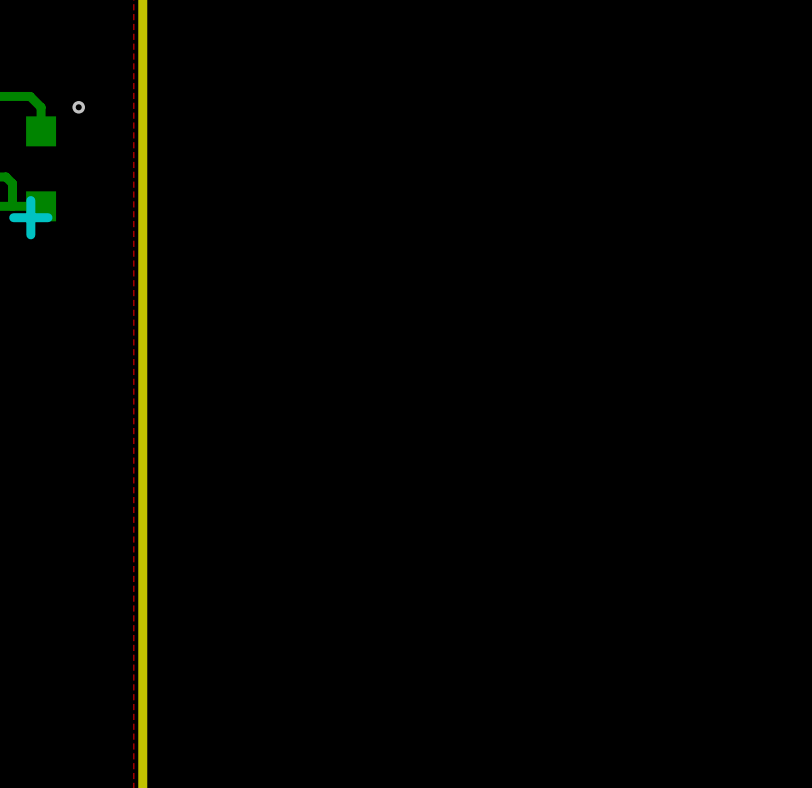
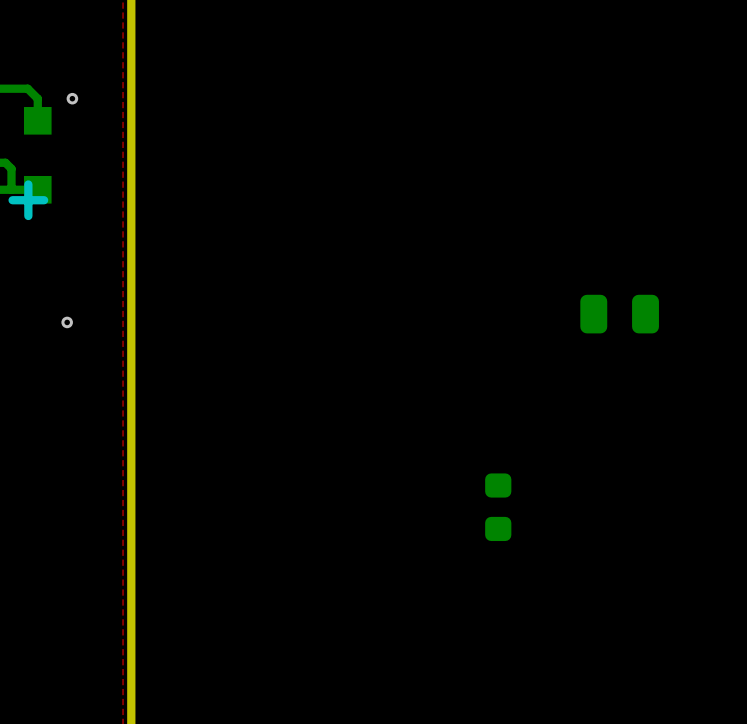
part: none -> (619, 314)
via: none -> (67, 322)
part: none -> (498, 507)

